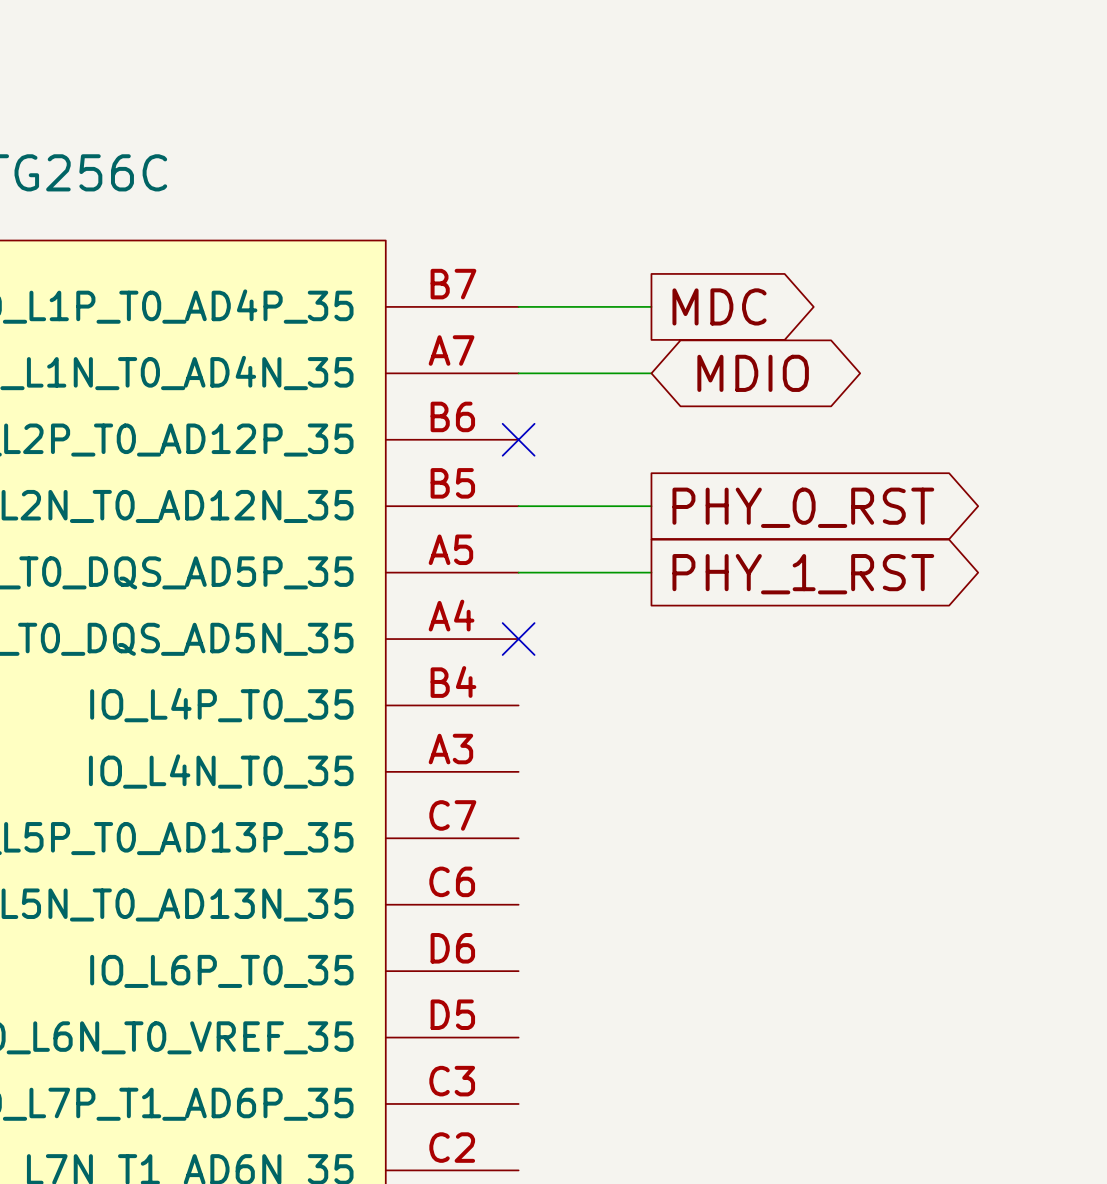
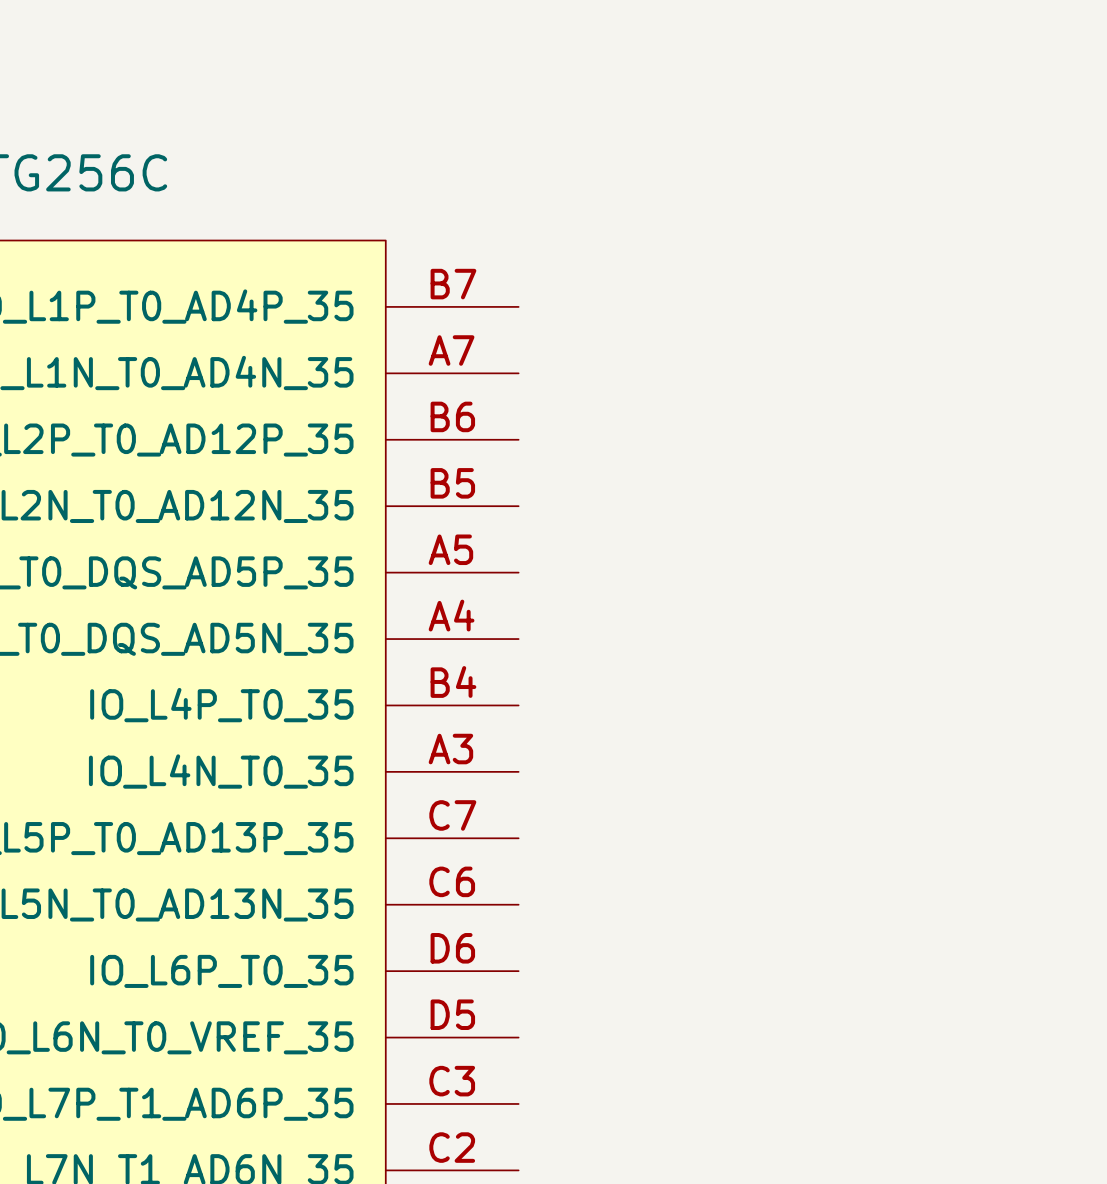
wire: (518, 306) (651, 306) -> none
global label: MDC (719, 306) -> none
wire: (518, 373) (651, 373) -> none
global label: MDIO (753, 373) -> none
no-connect mark: (518, 439) -> none
wire: (518, 506) (651, 506) -> none
global label: PHY_0_RST (803, 507) -> none
wire: (518, 572) (651, 572) -> none
global label: PHY_1_RST (803, 574) -> none
no-connect mark: (518, 639) -> none

